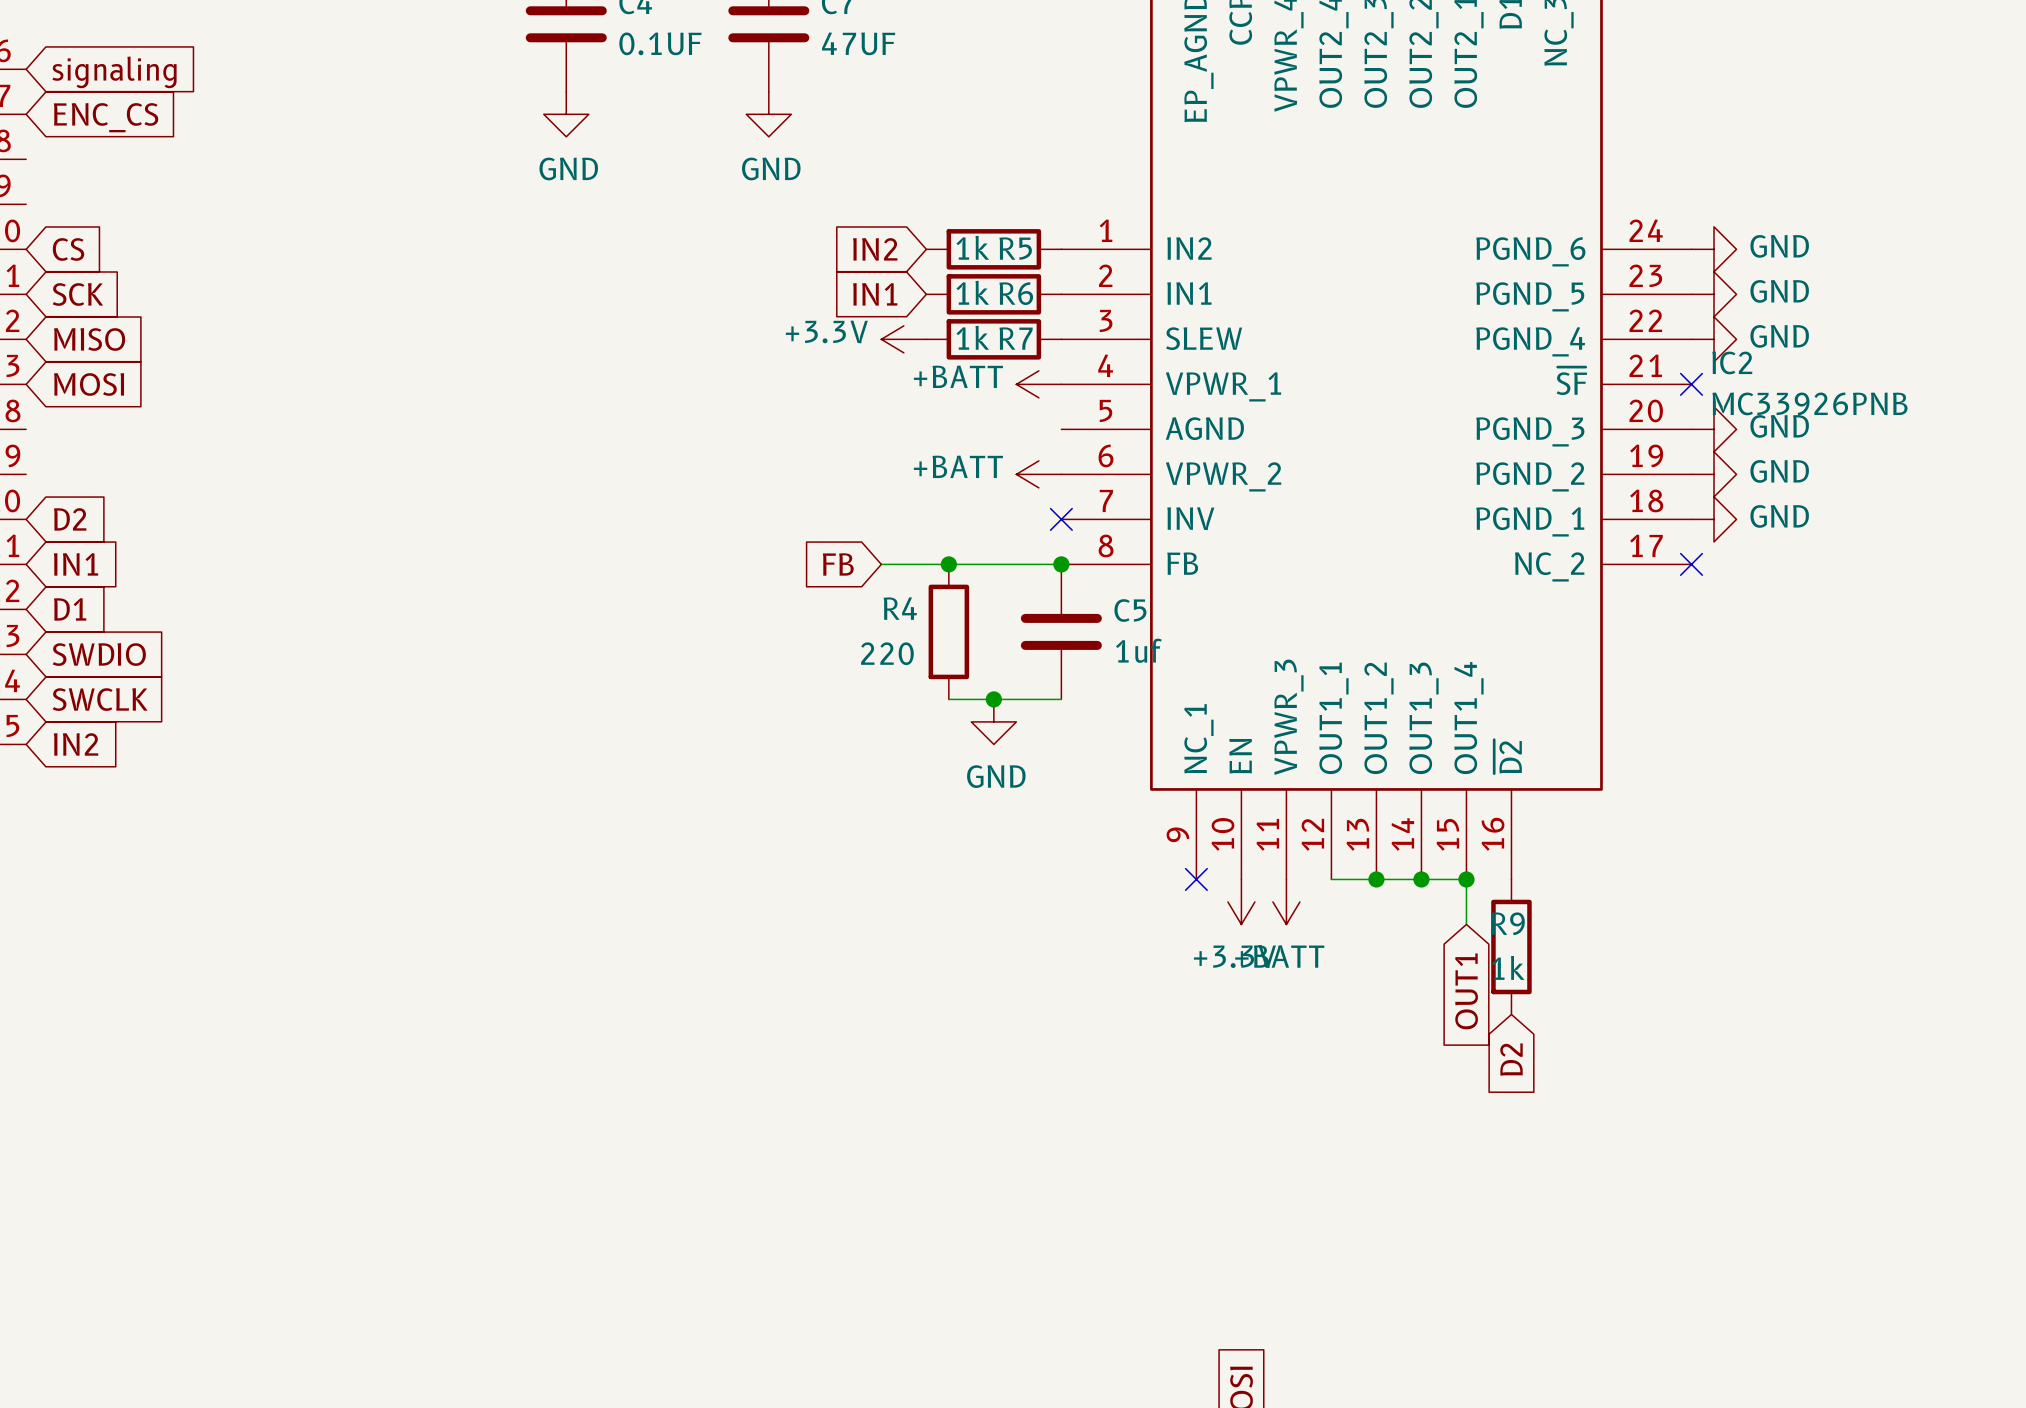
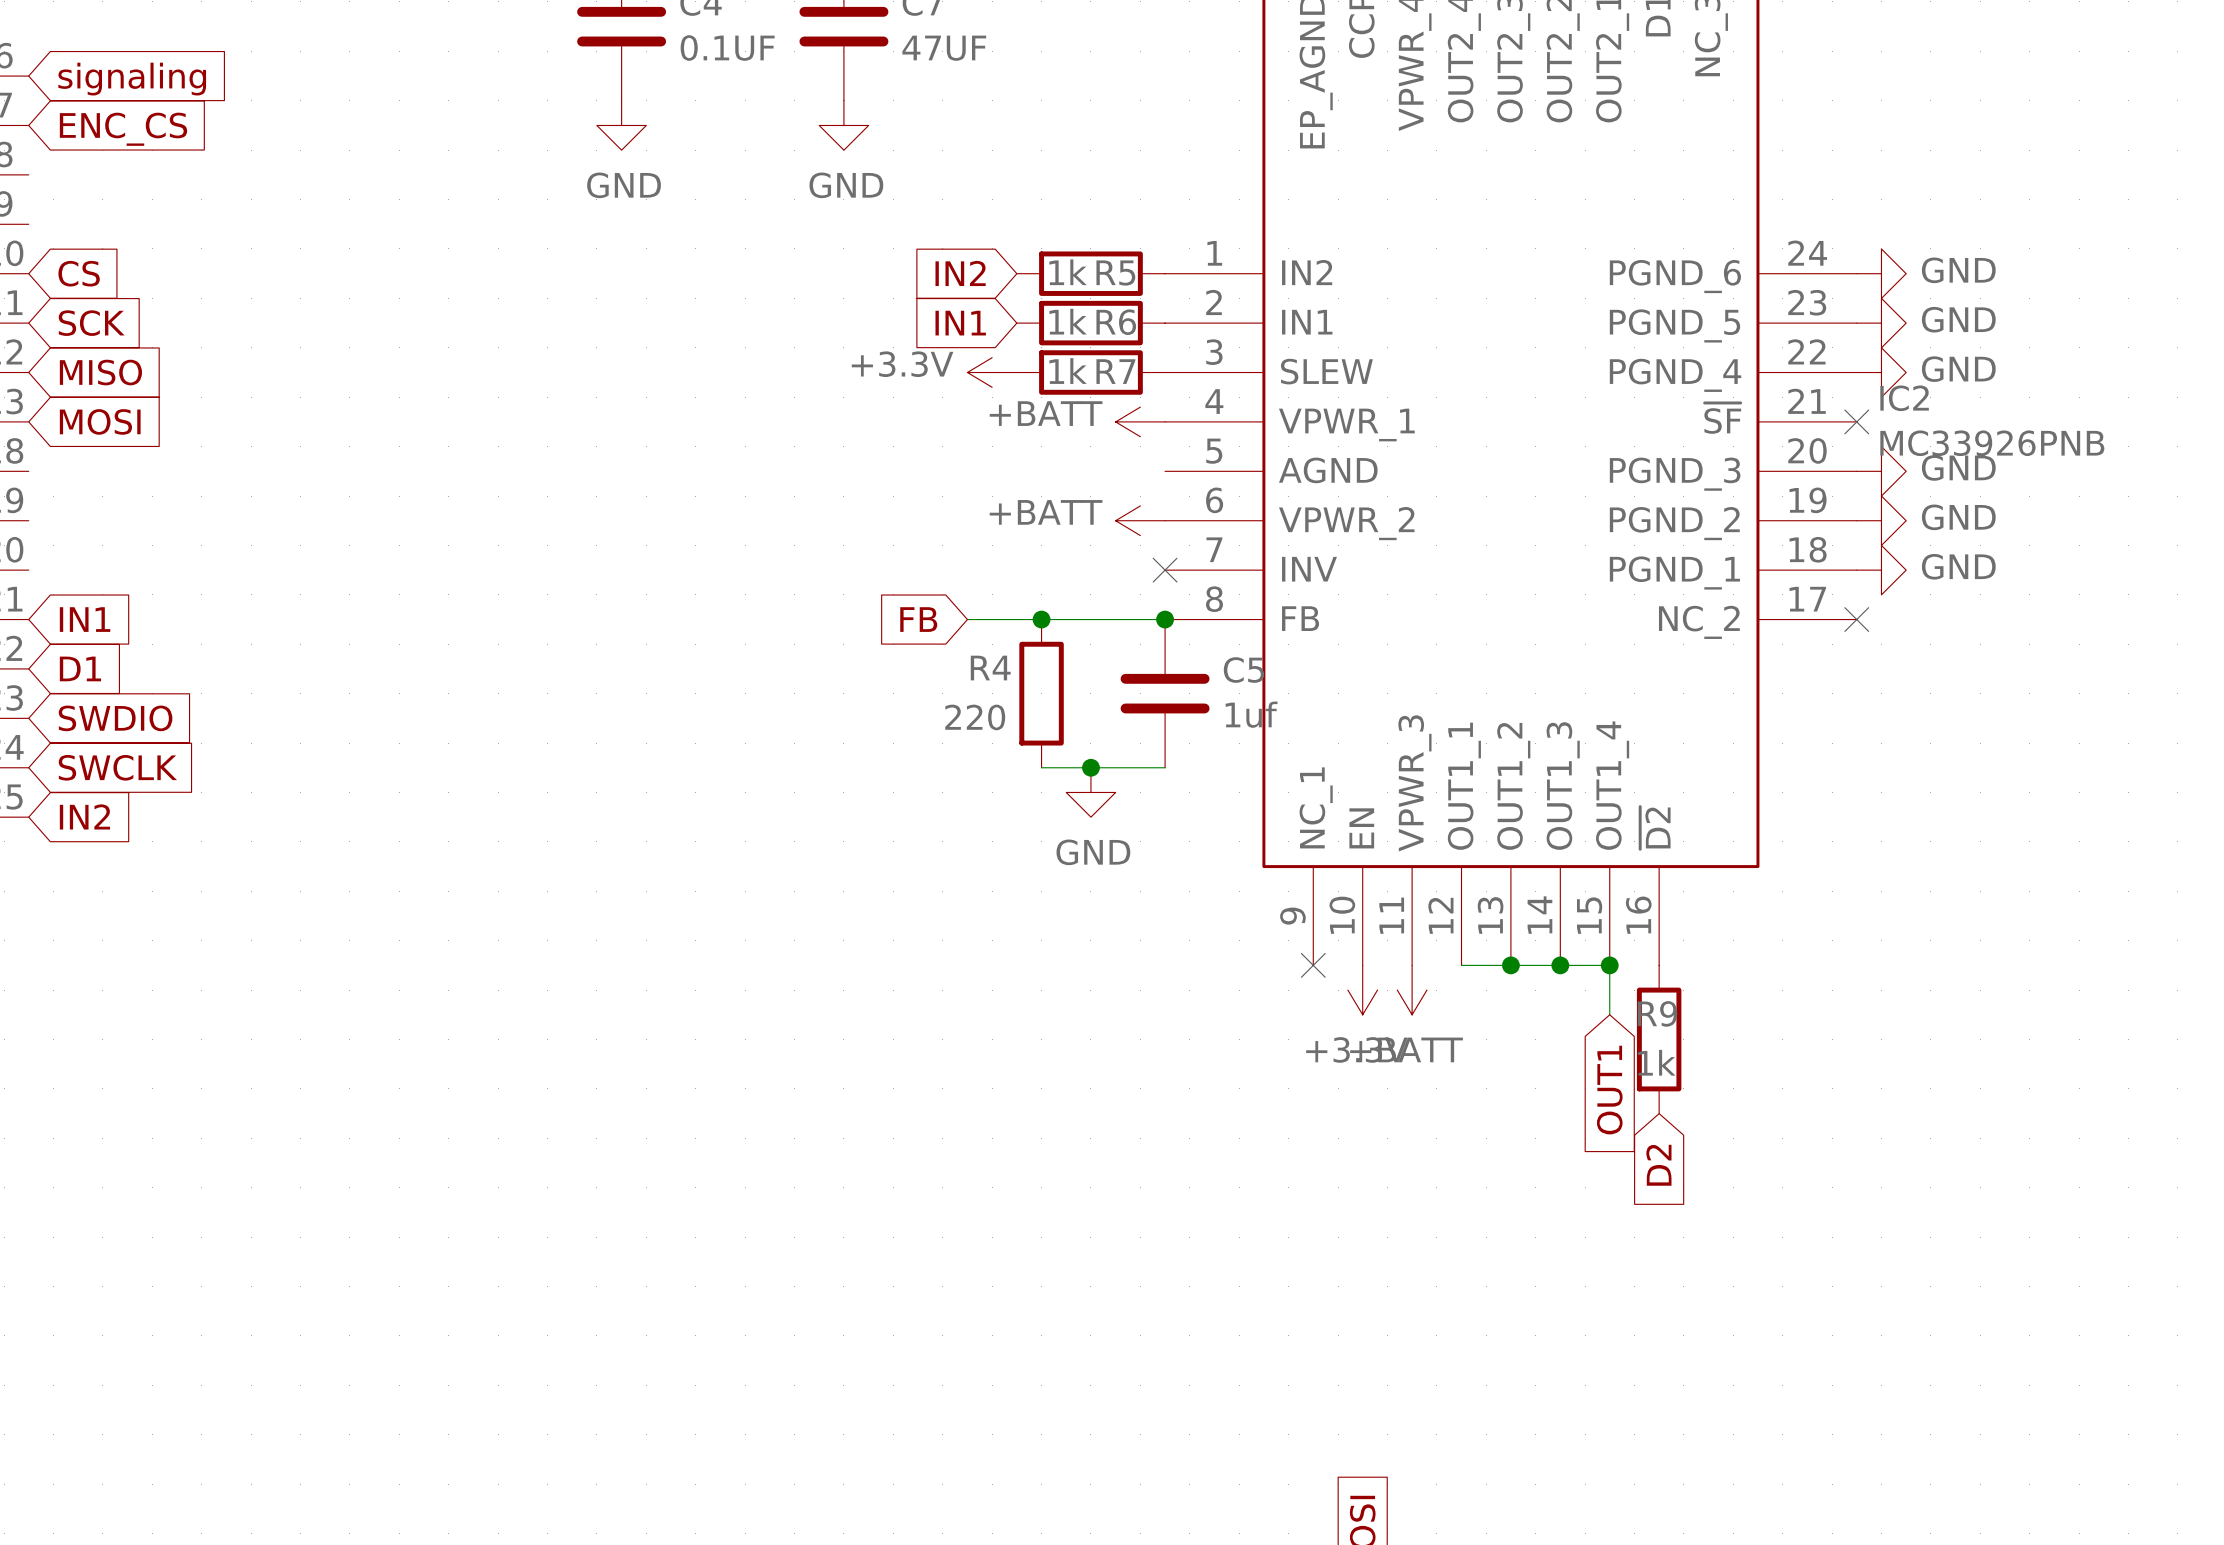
global label: D2 (70, 519) -> none

